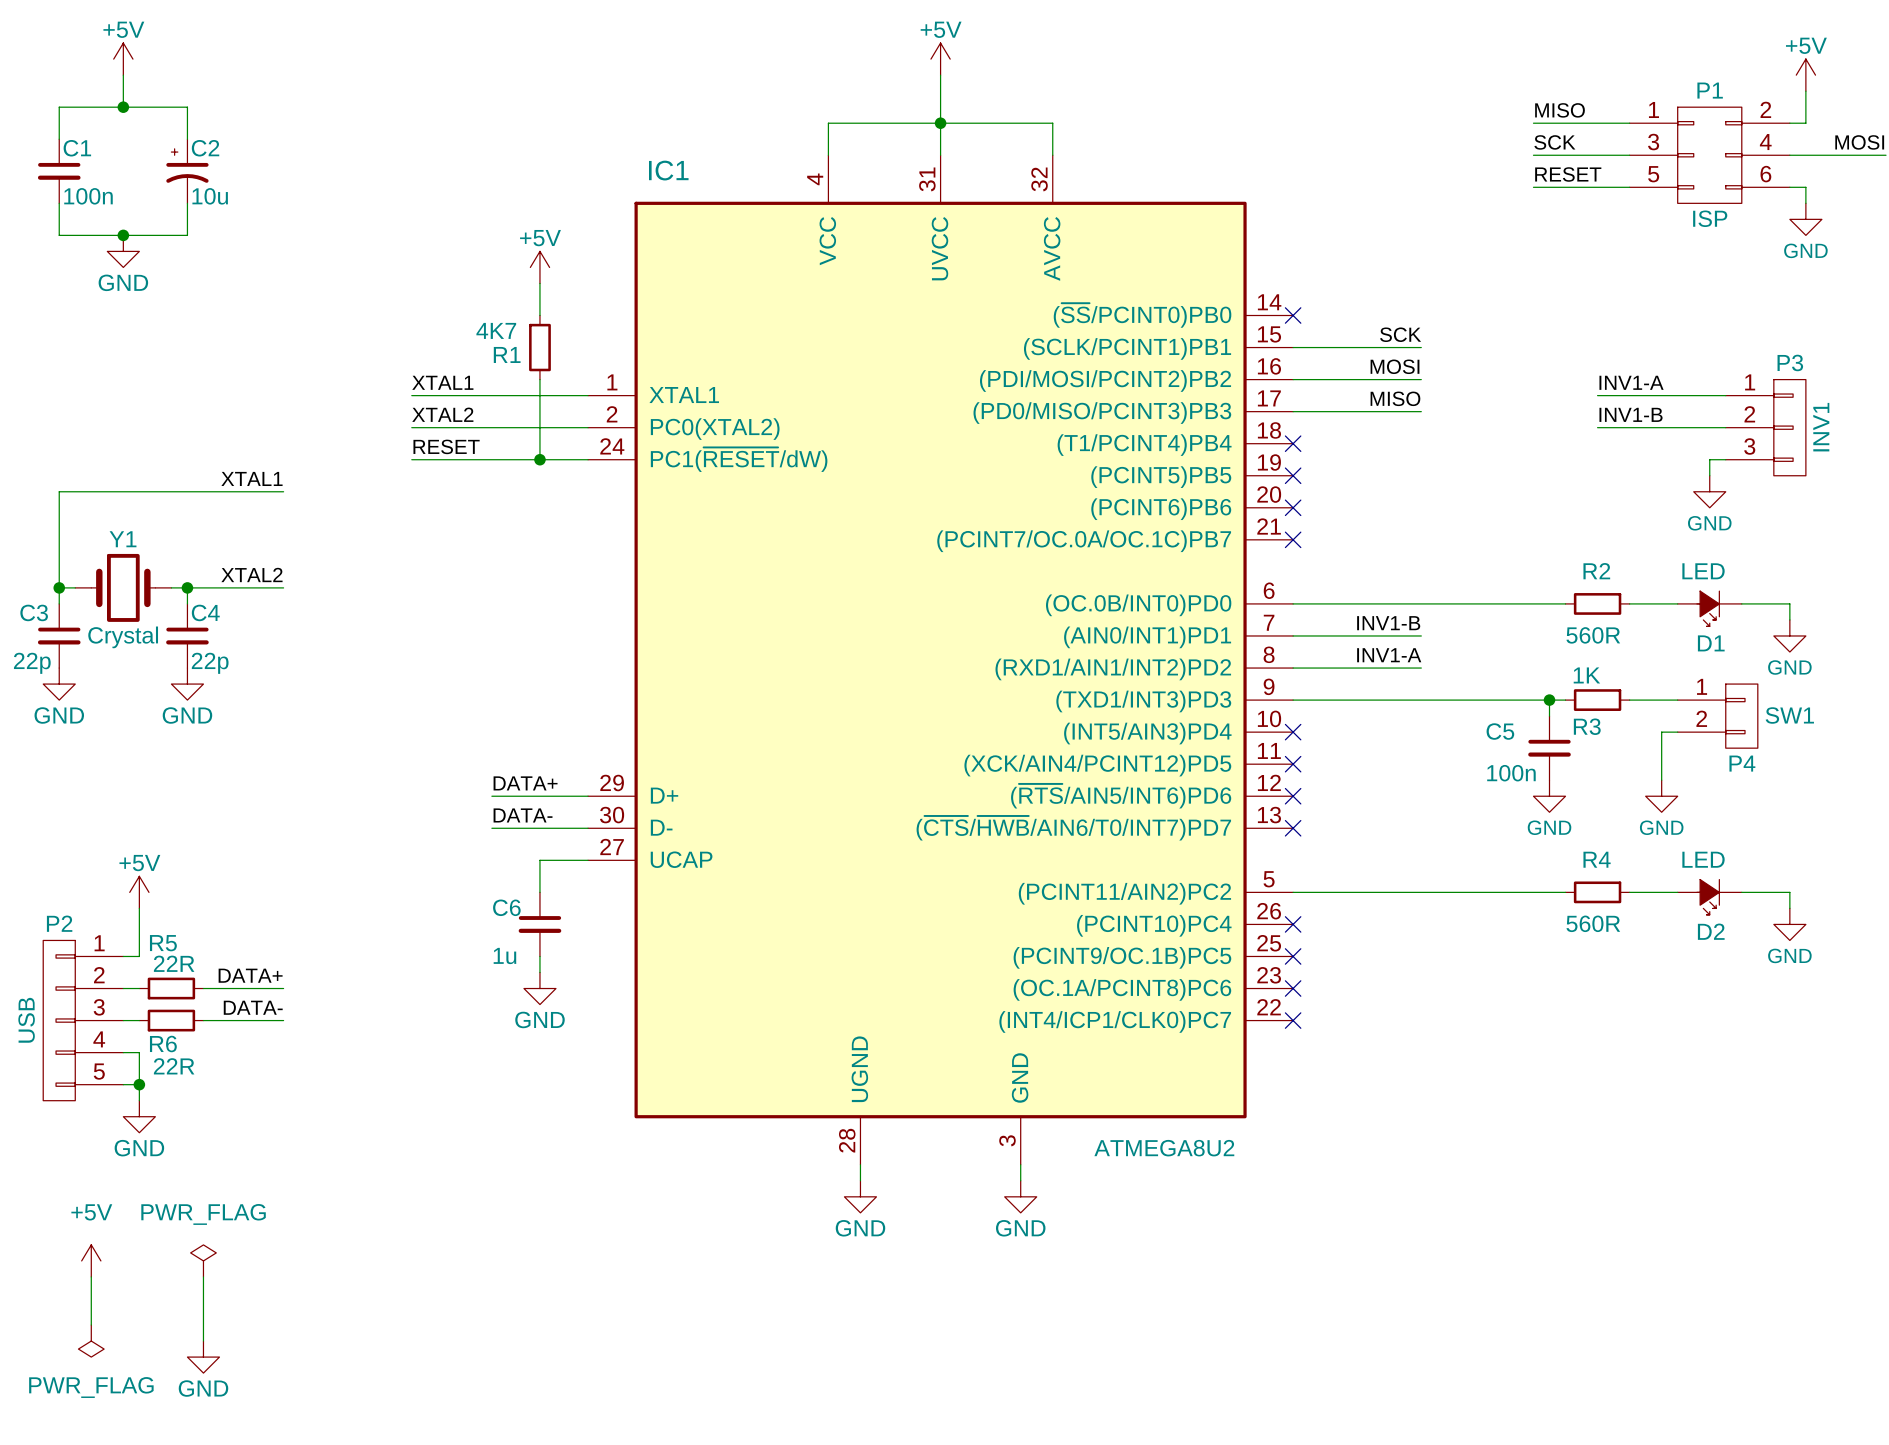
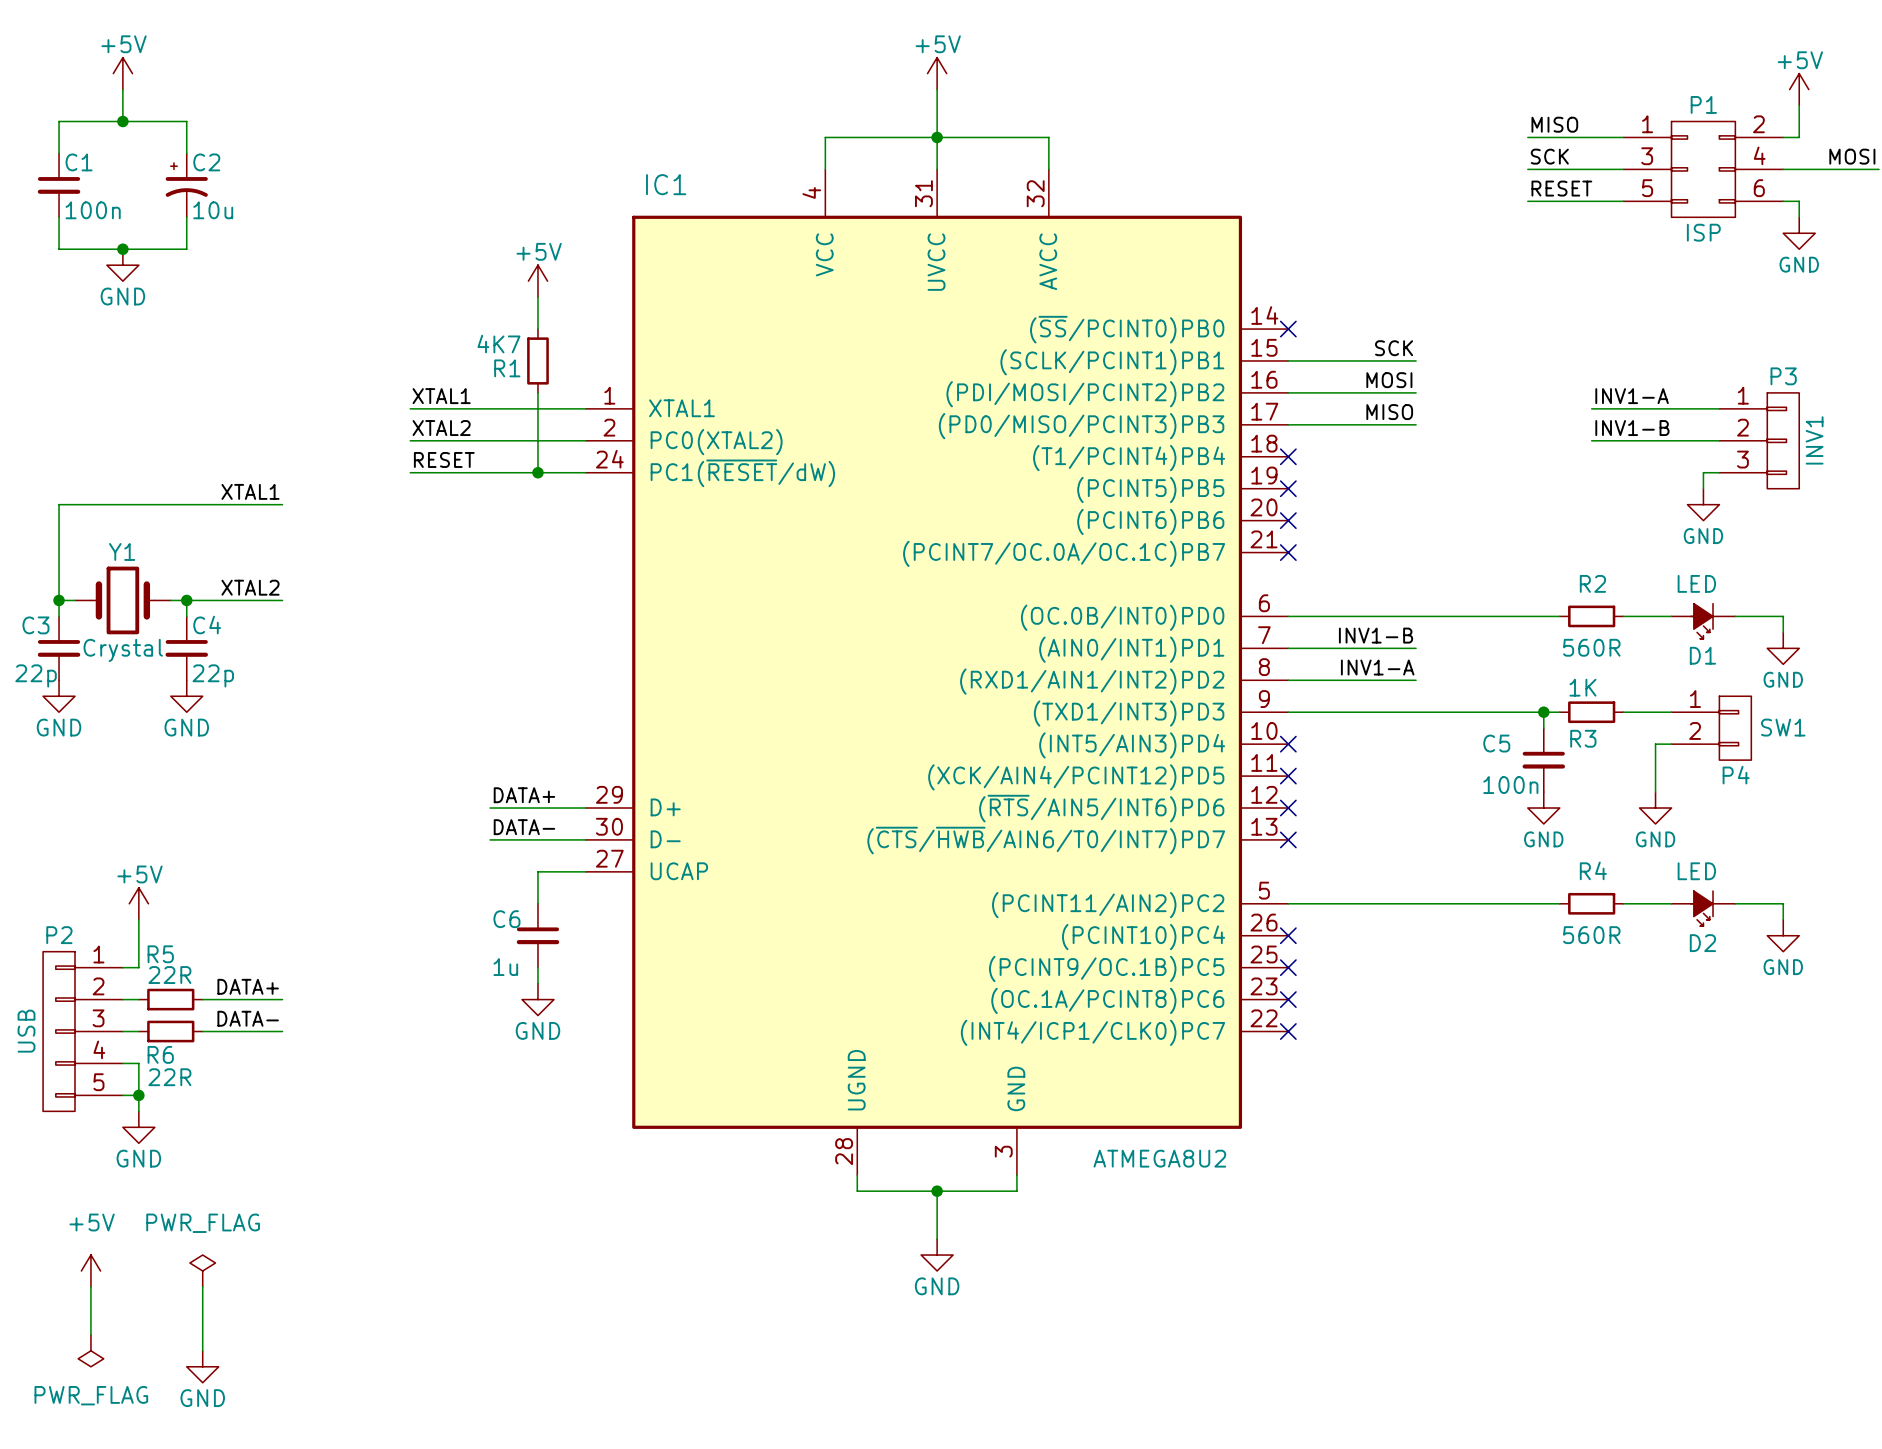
wire: none -> (857, 1191) (1016, 1191)
wire: none -> (937, 1191) (937, 1239)
junction: none -> (937, 1191)
power symbol: GND (860, 1196) -> none
power symbol: GND (1020, 1196) -> none
power symbol: none -> GND (937, 1255)

